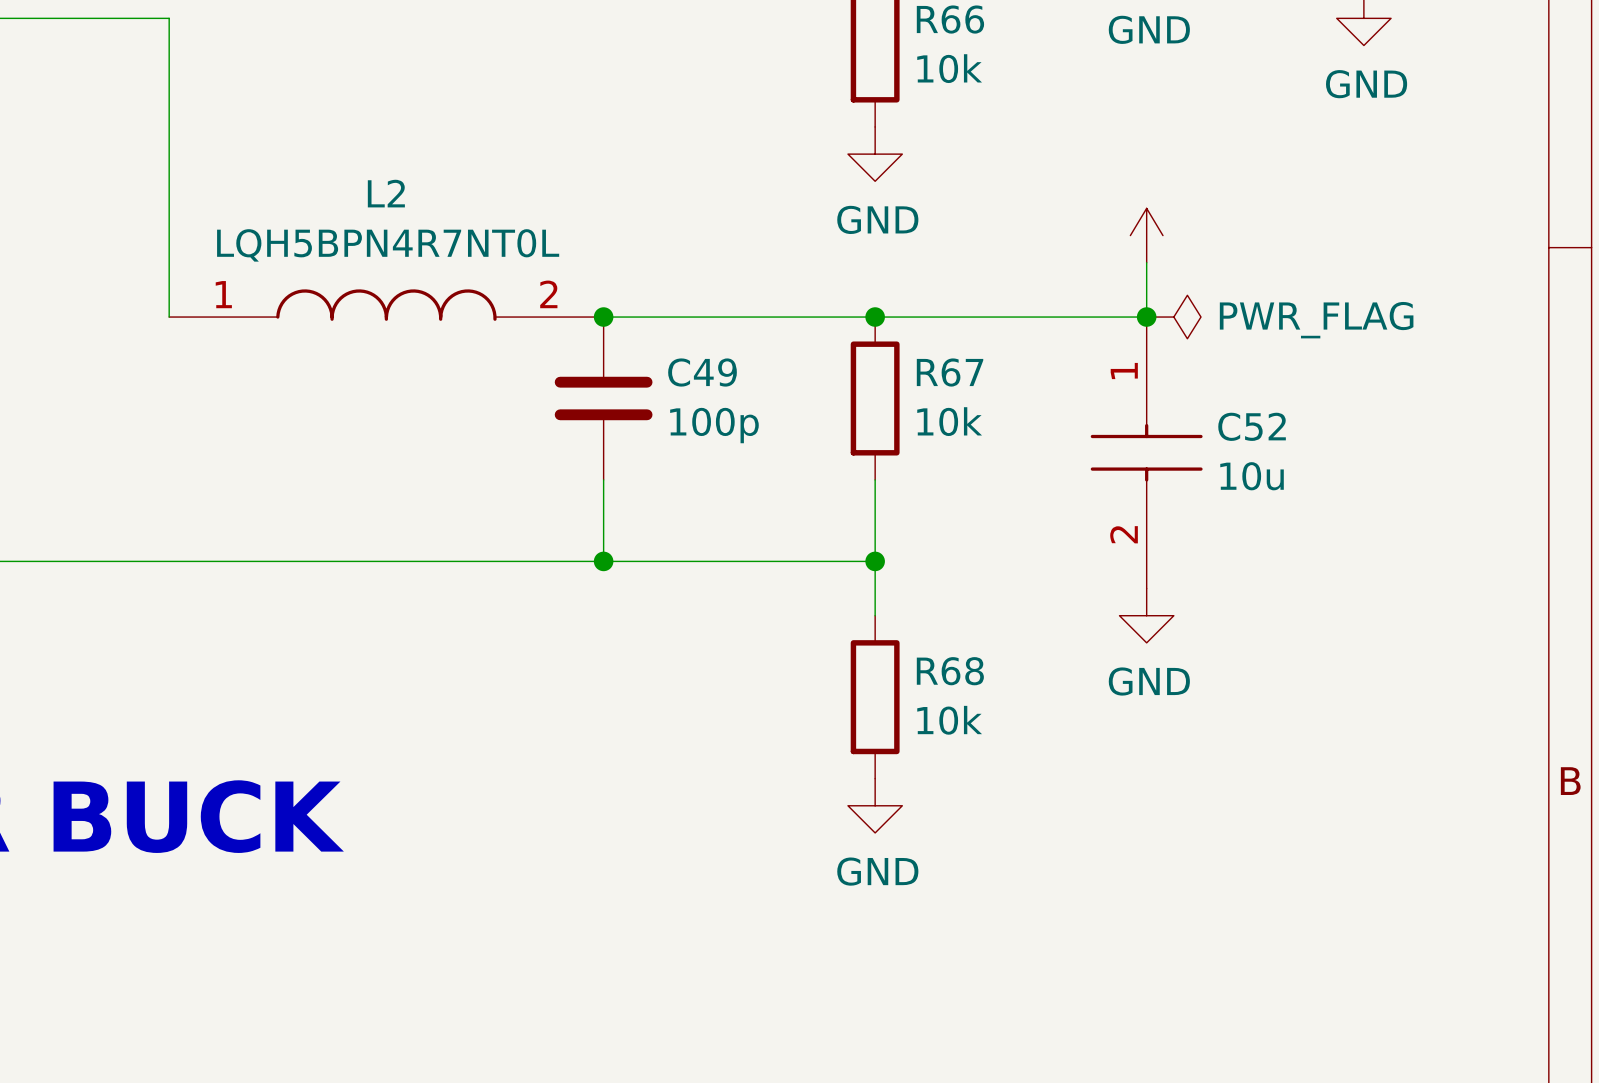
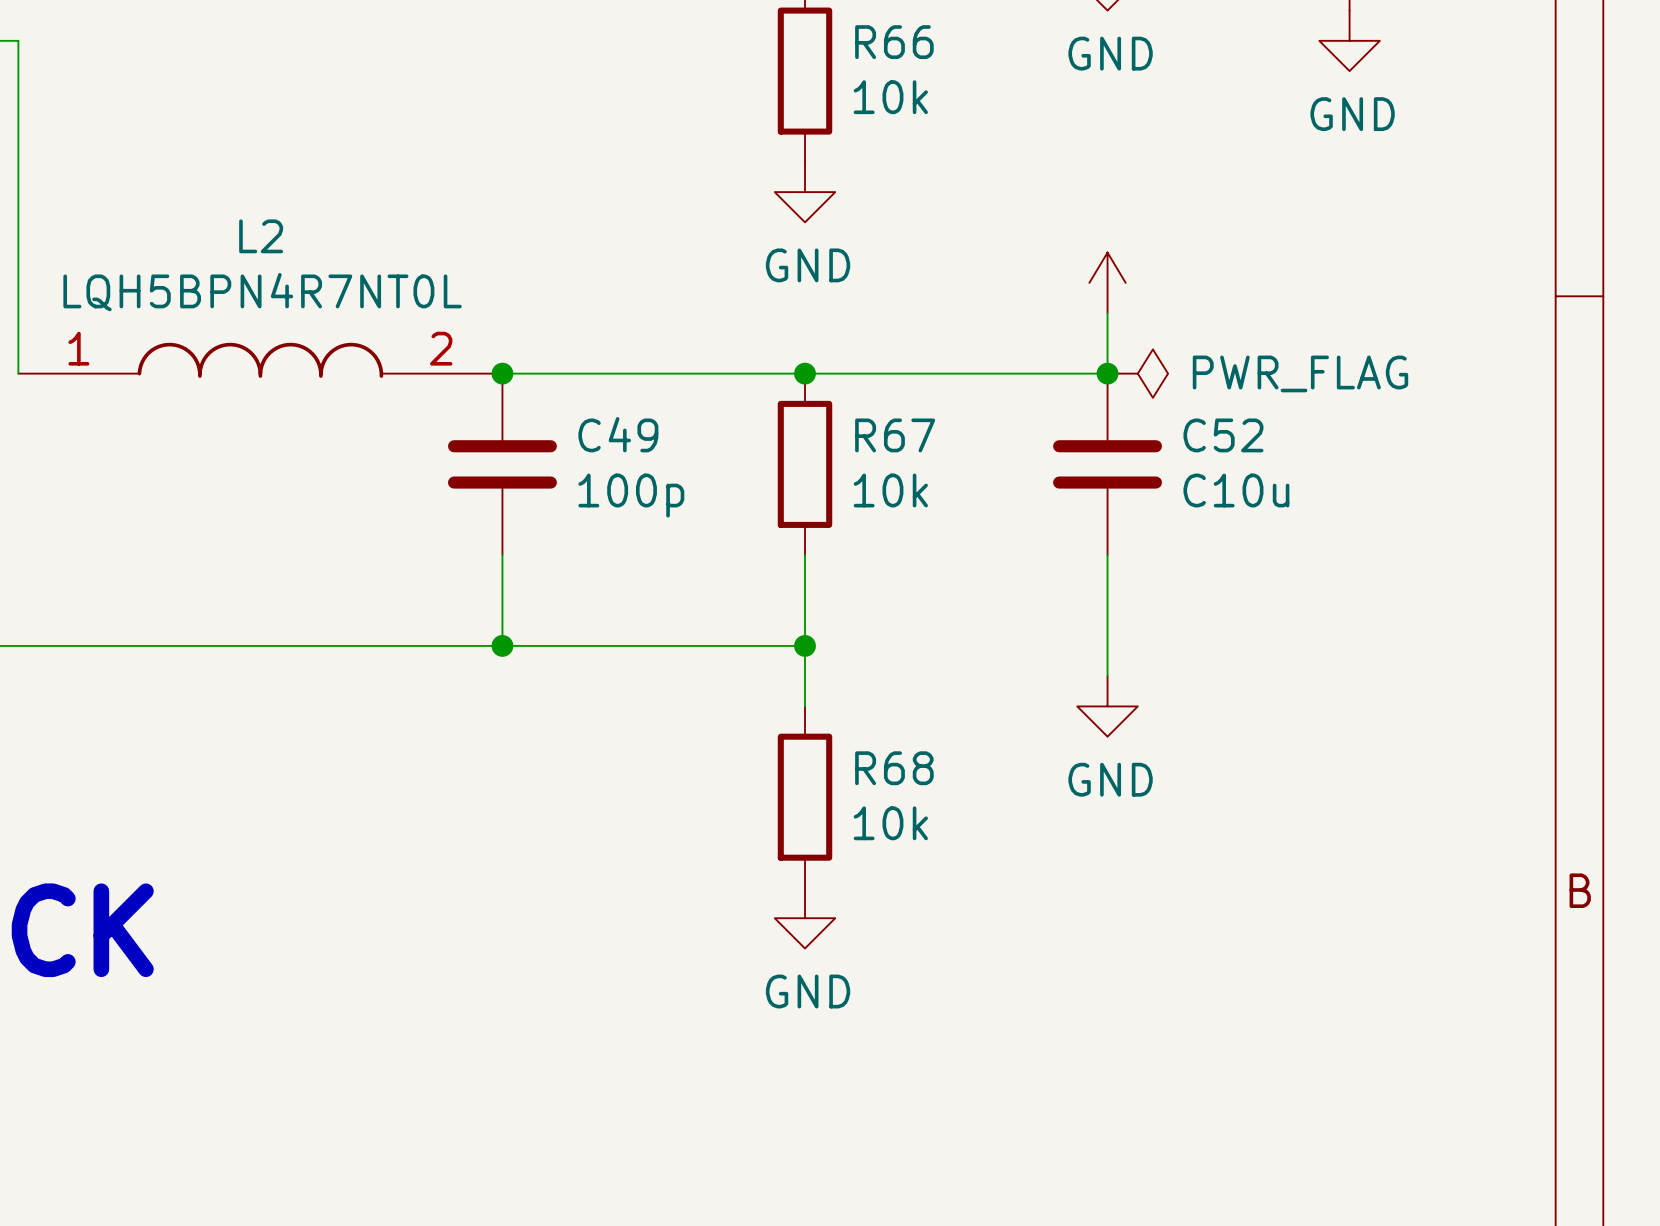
C52 symbol: [1090, 317, 1203, 589] -> [1053, 373, 1163, 556]
C52 value: 10u (1252, 476) -> C10u (1236, 490)

